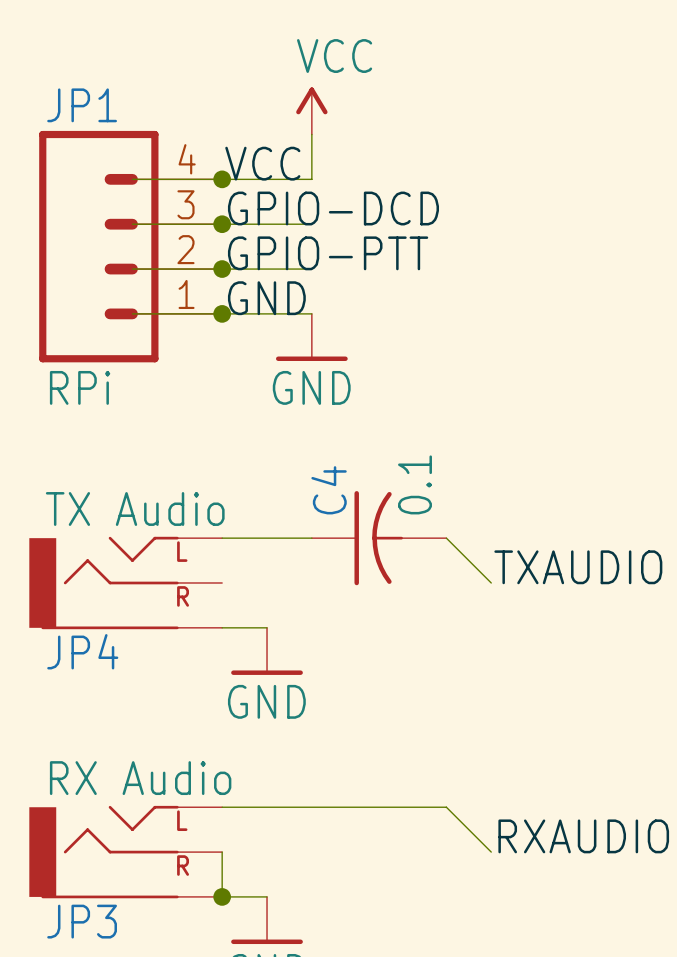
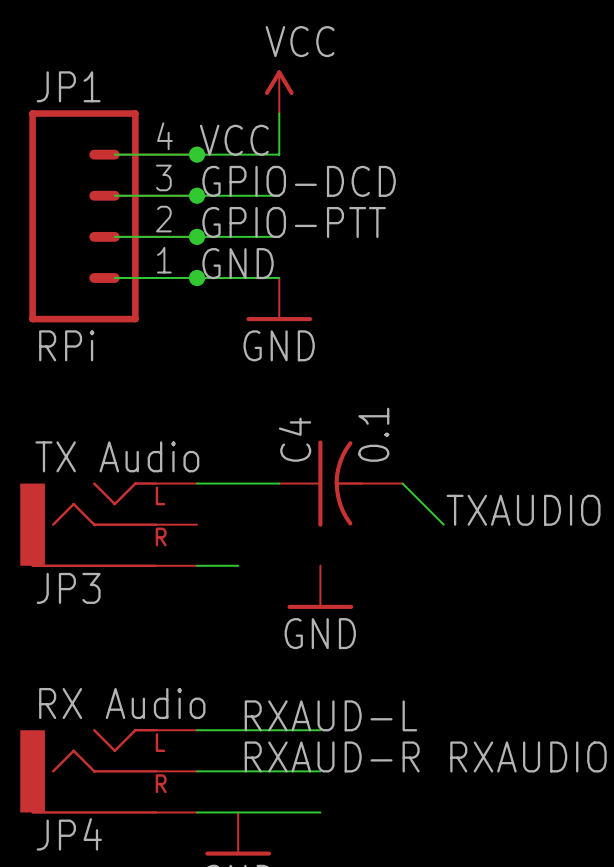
JP4 name: JP4 (82, 651) -> JP3 (68, 588)
power symbol position: GND (267, 651) -> GND (320, 587)
label: none -> RXAUD-L (330, 715)
wire: (356, 807) (446, 807) (491, 852) -> none
label: none -> RXAUD-R (332, 756)
wire: (222, 852) (222, 896) -> (197, 771) (320, 771)
junction: (222, 896) -> none
wire: none -> (238, 812) (320, 812)
JP3 name: JP3 (82, 921) -> JP4 (69, 834)

